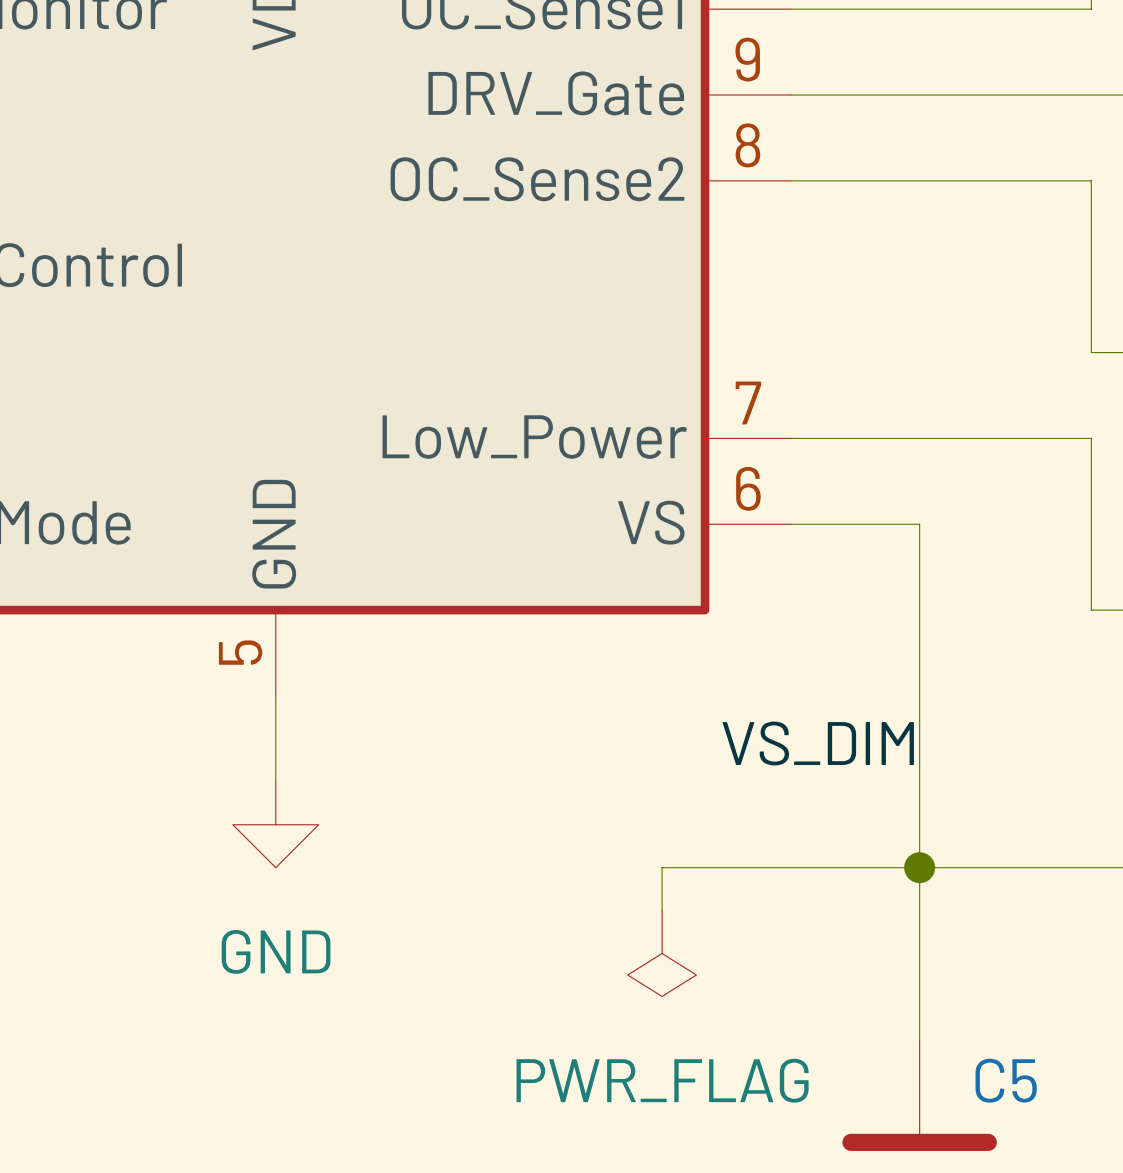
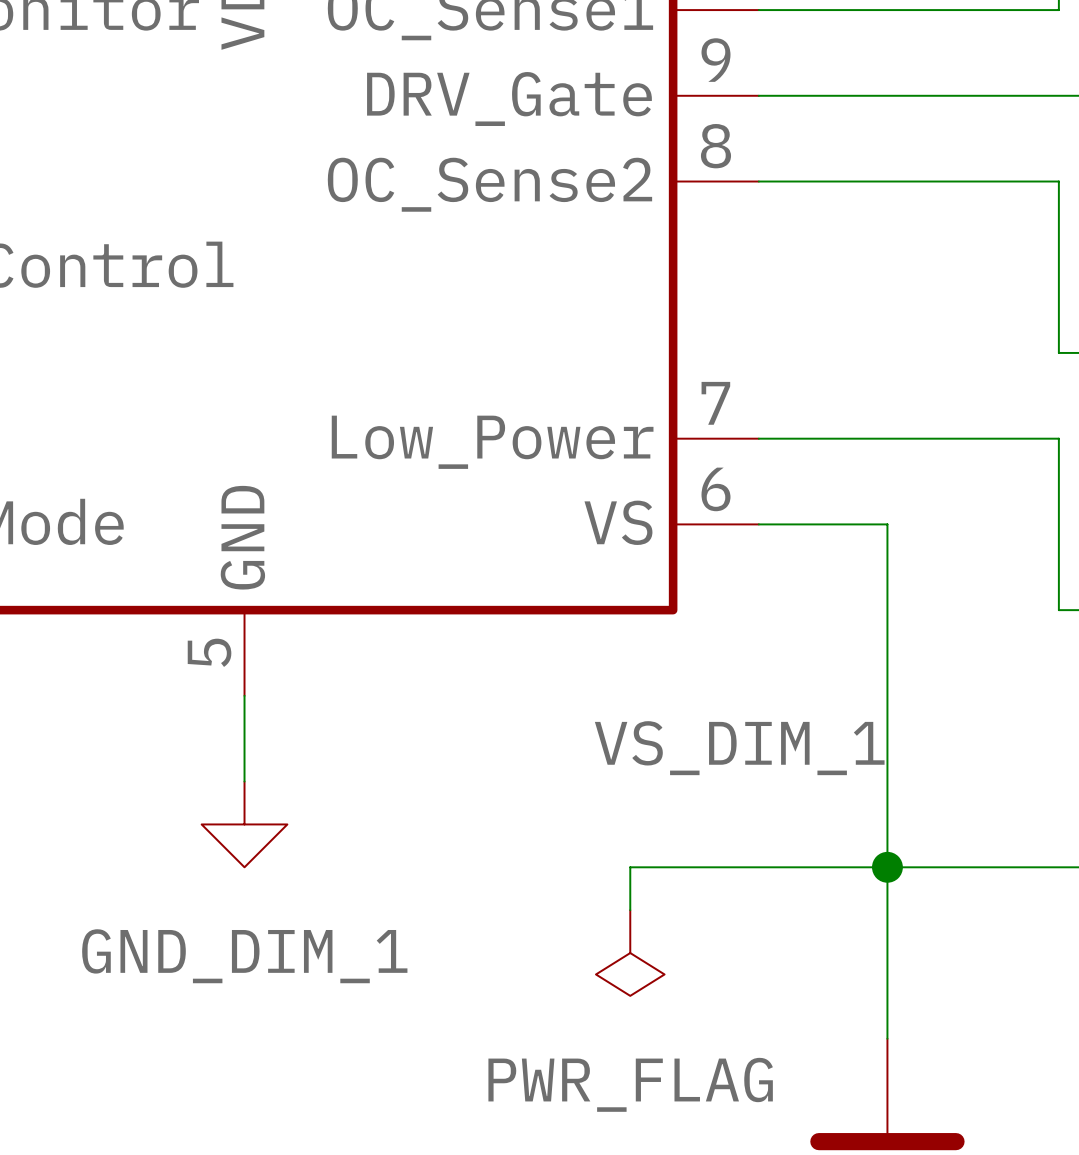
label: VS_DIM (818, 743) -> VS_DIM_1 (739, 748)
power symbol: GND (275, 824) -> GND_DIM_1 (244, 824)
C5 name: C5 (1006, 1080) -> none

